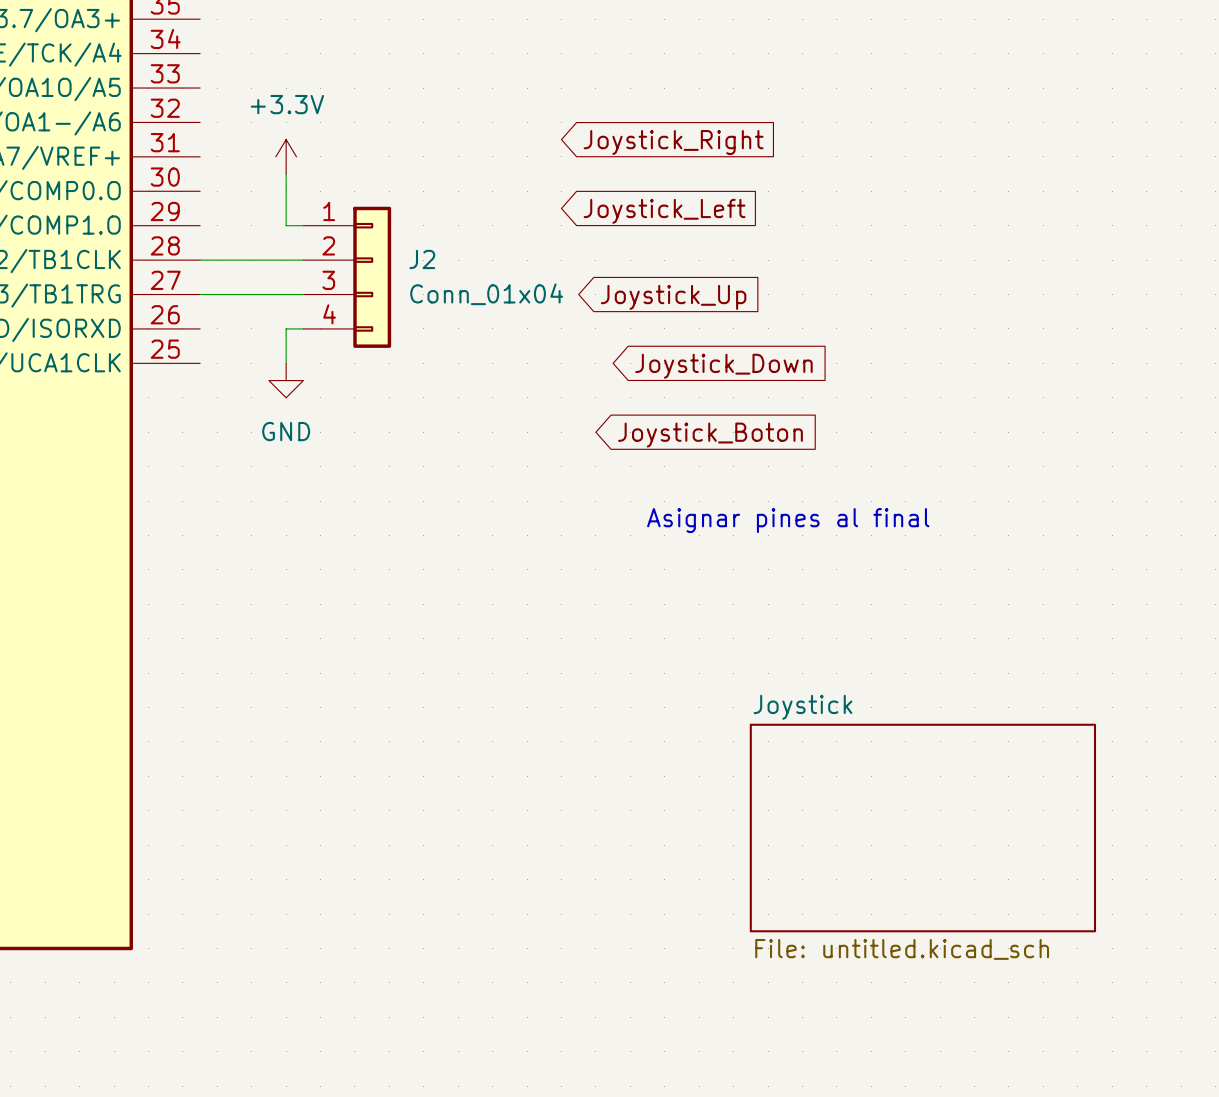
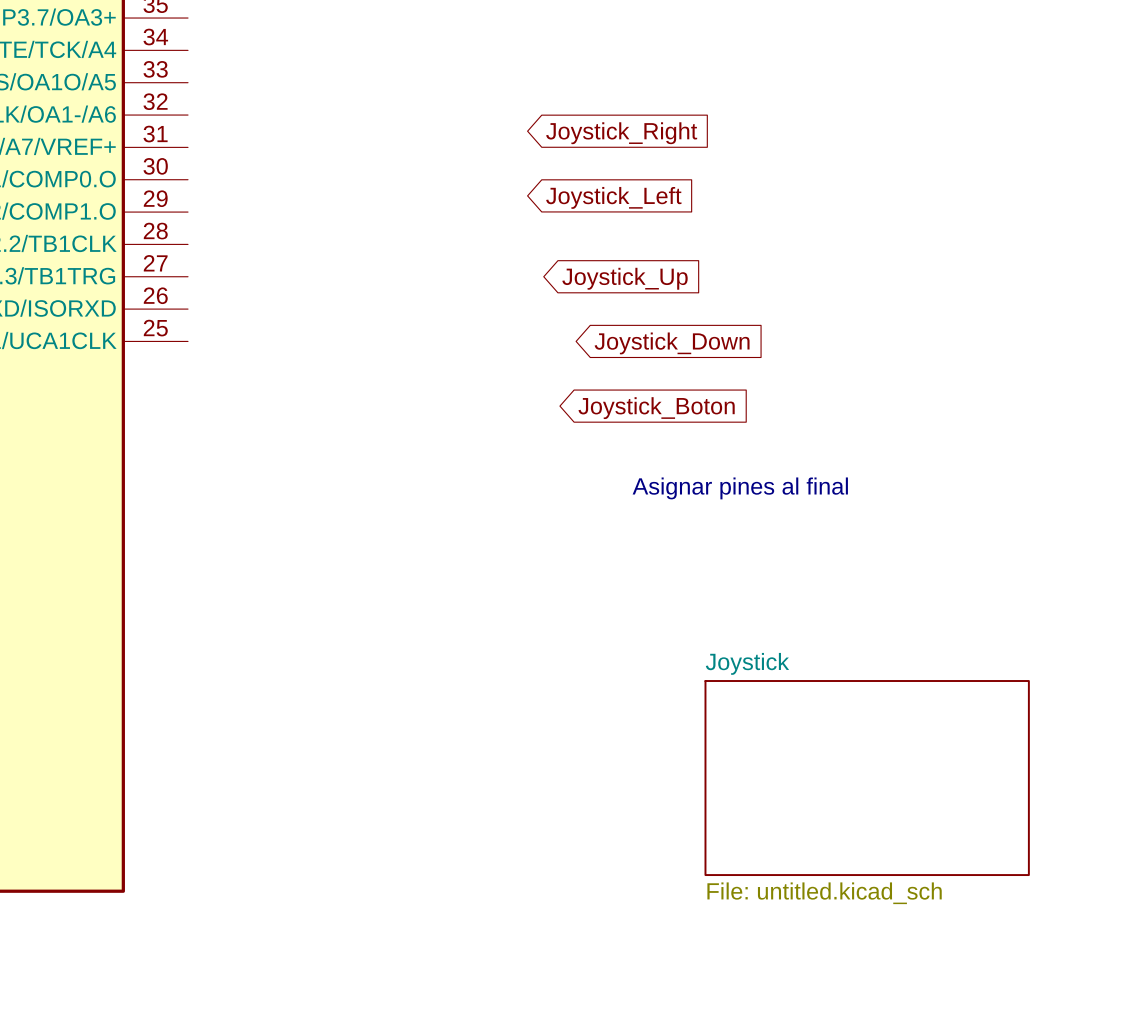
power symbol: +3.3V (286, 156) -> none
wire: (286, 174) (286, 225) (303, 225) -> none
wire: (200, 260) (303, 260) -> none
J2: Conn_01x04 (347, 277) -> none
wire: (200, 294) (303, 294) -> none
wire: (303, 328) (286, 328) (286, 363) -> none
power symbol: GND (286, 380) -> none

